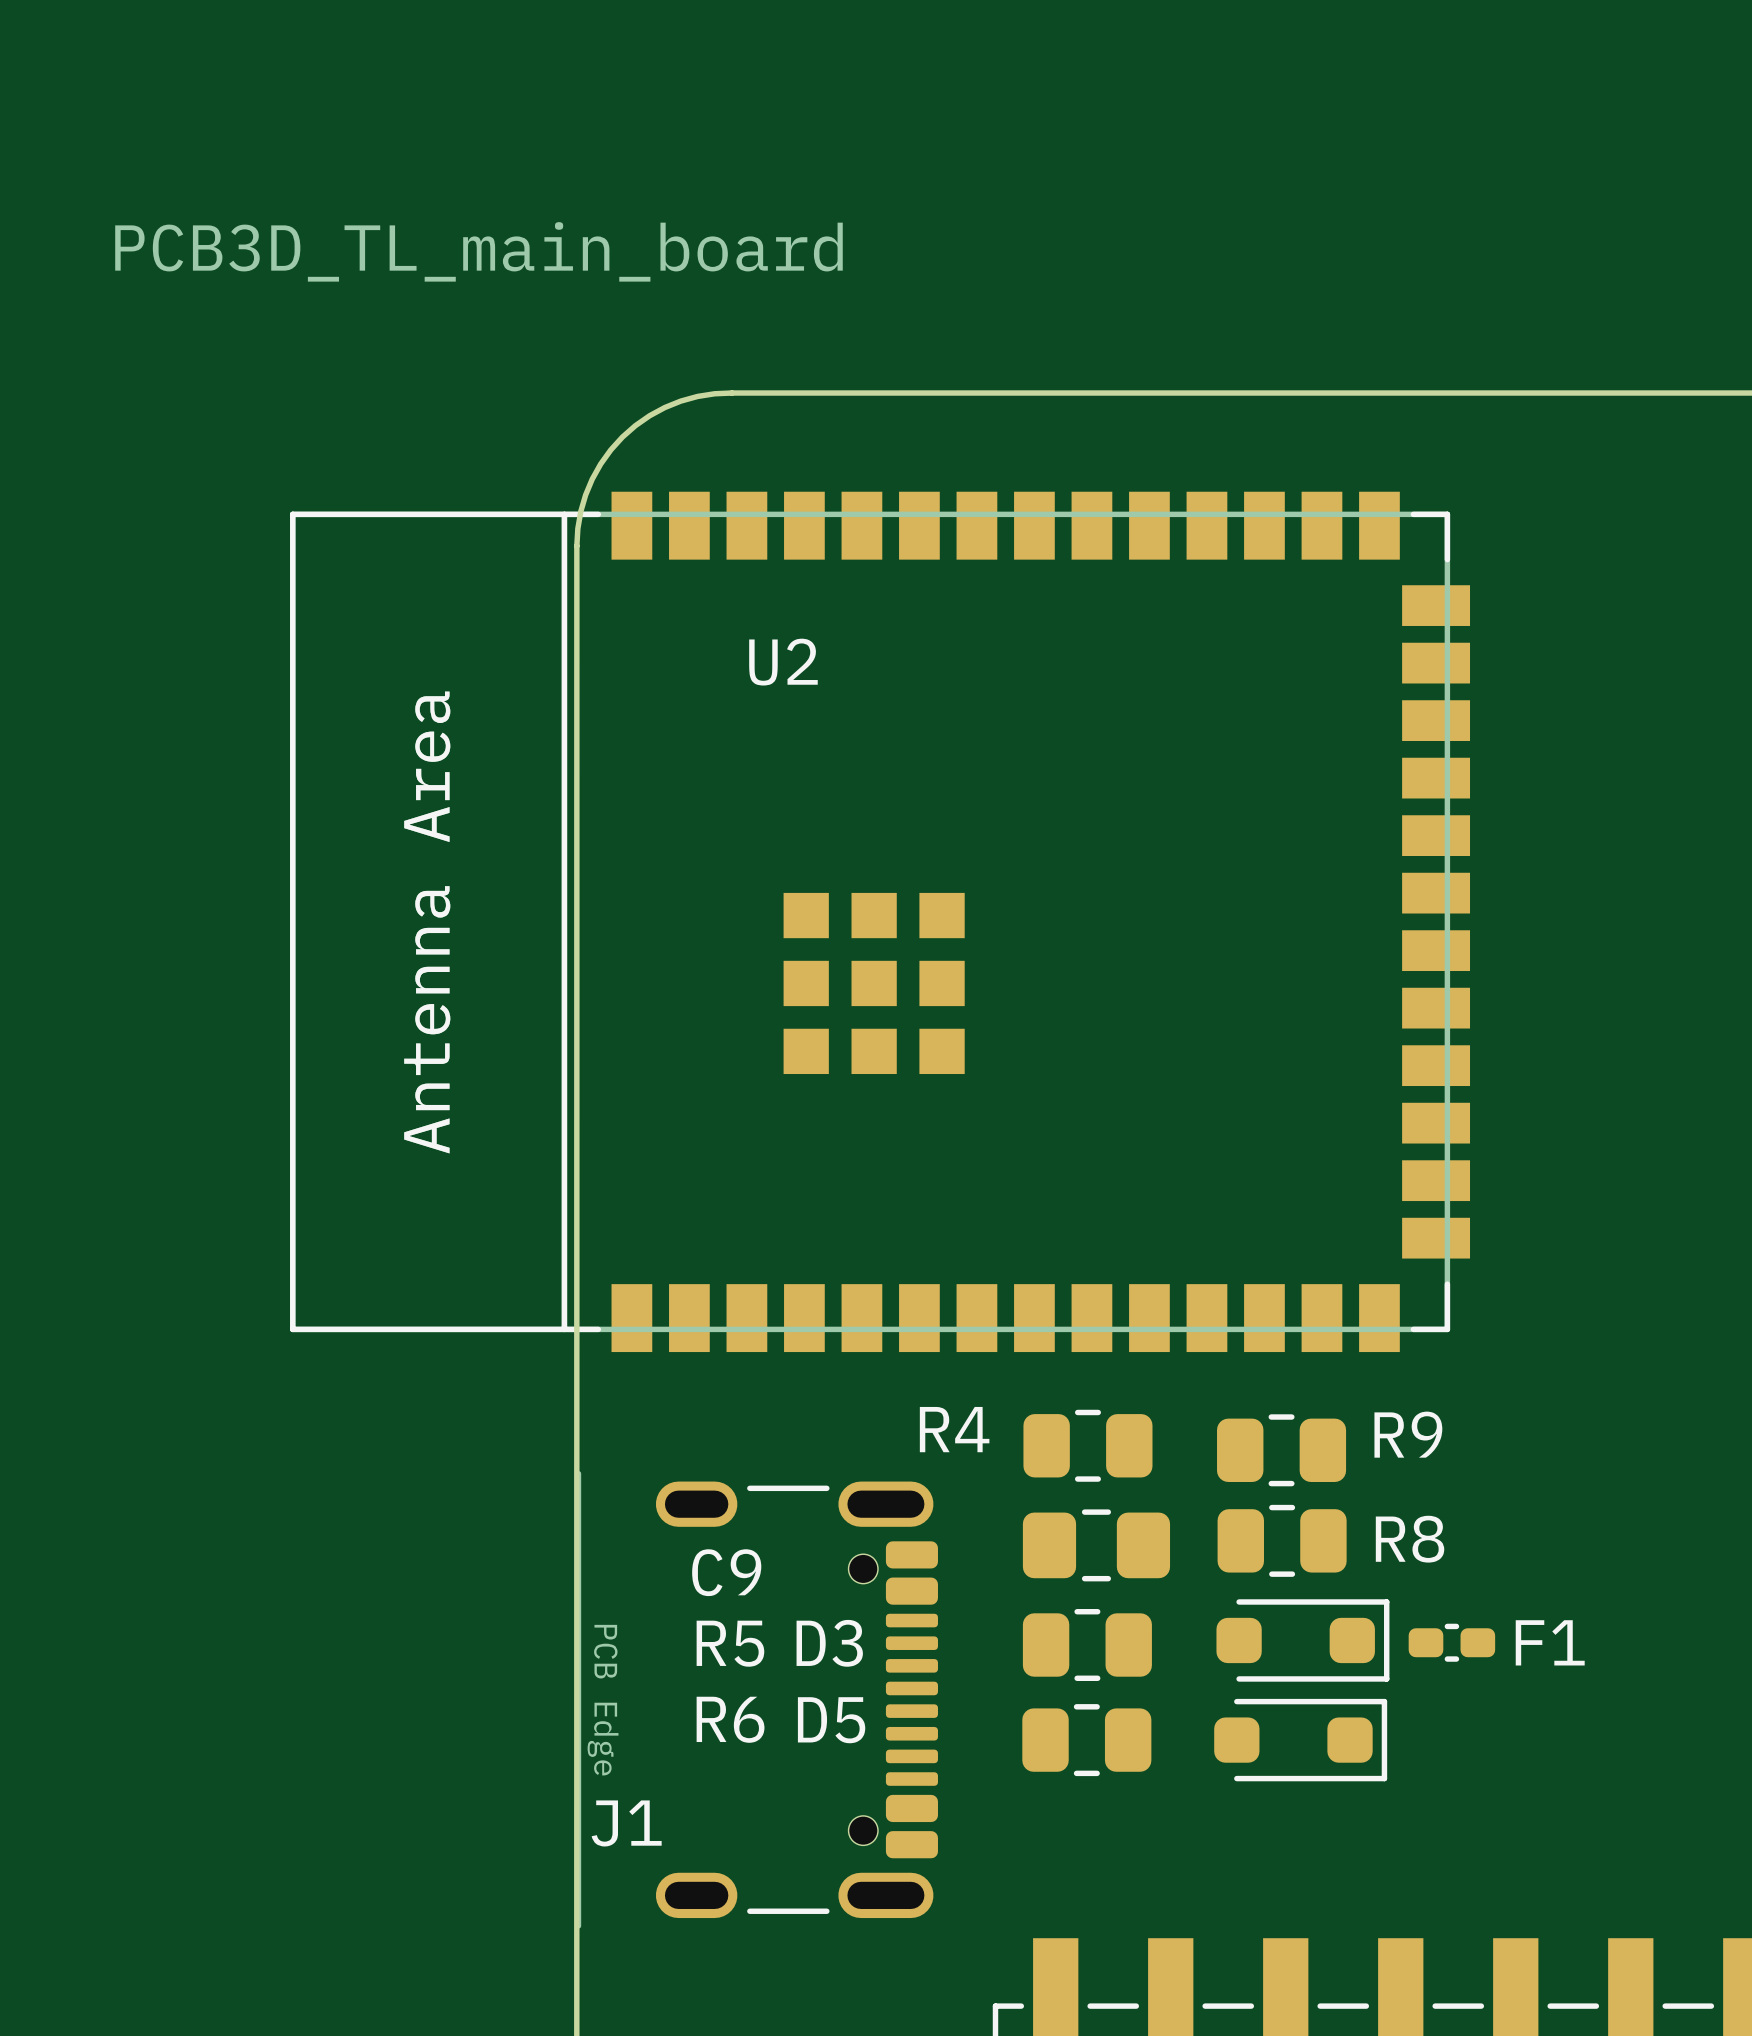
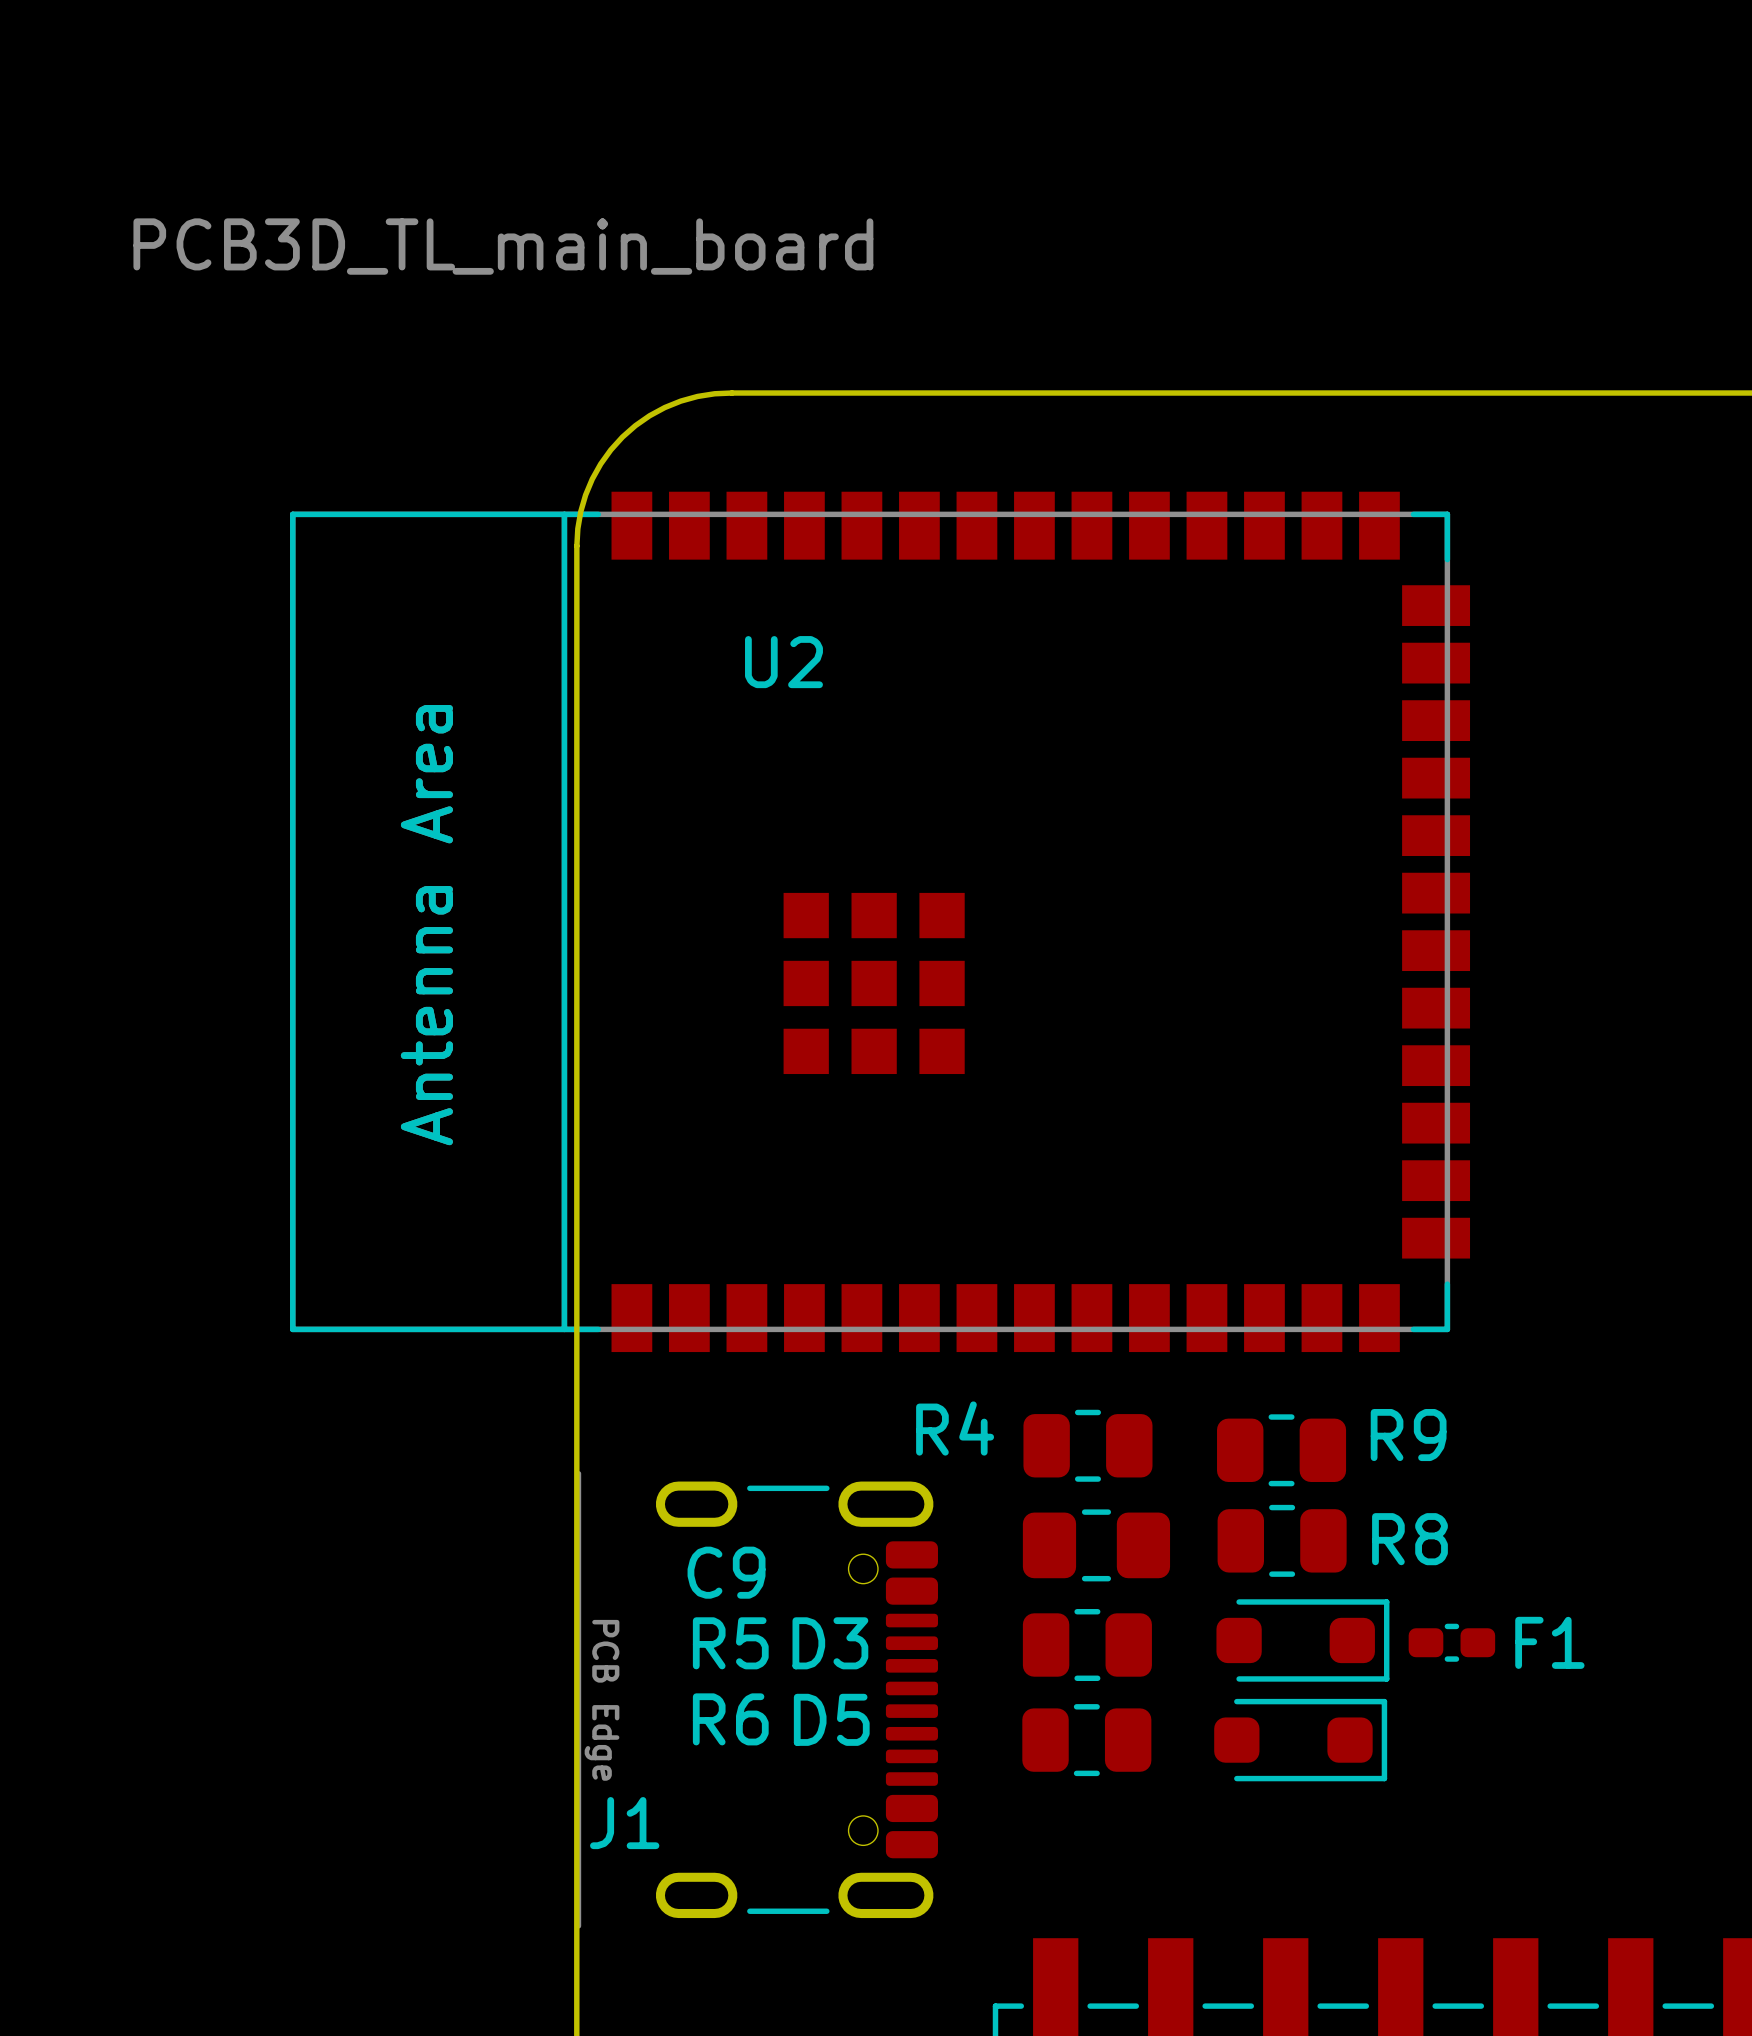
text position: PCB3D_TL_main_board (478, 251) -> PCB3D_TL_main_board (503, 246)

